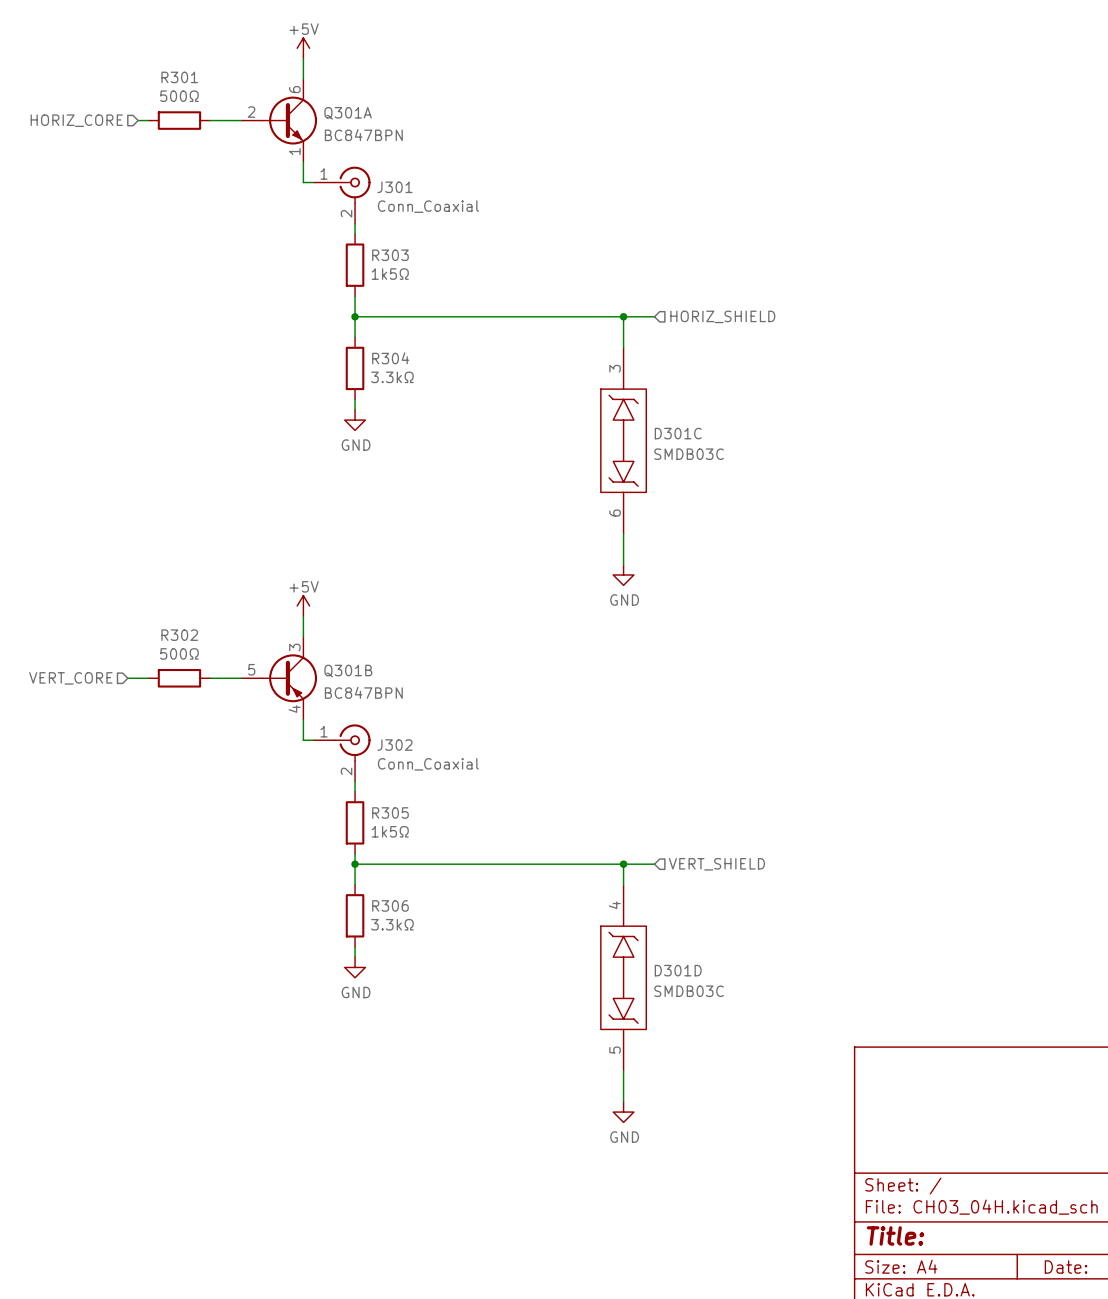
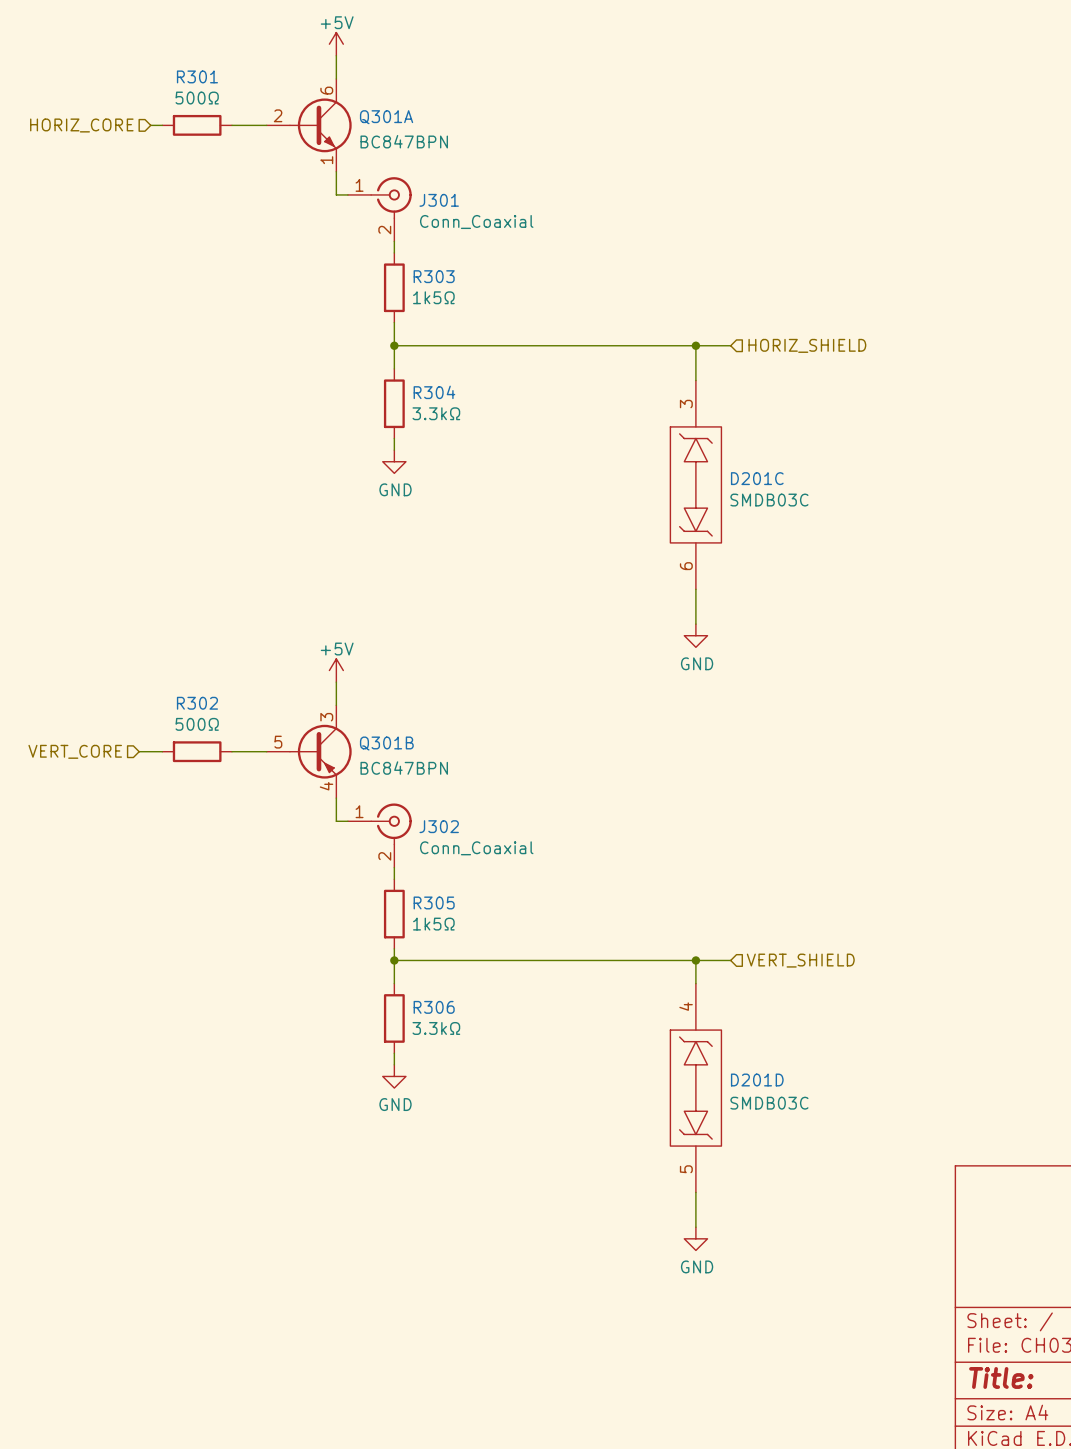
D301C name: D301C (678, 433) -> D201C (757, 478)
D301D name: D301D (678, 970) -> D201D (757, 1080)

